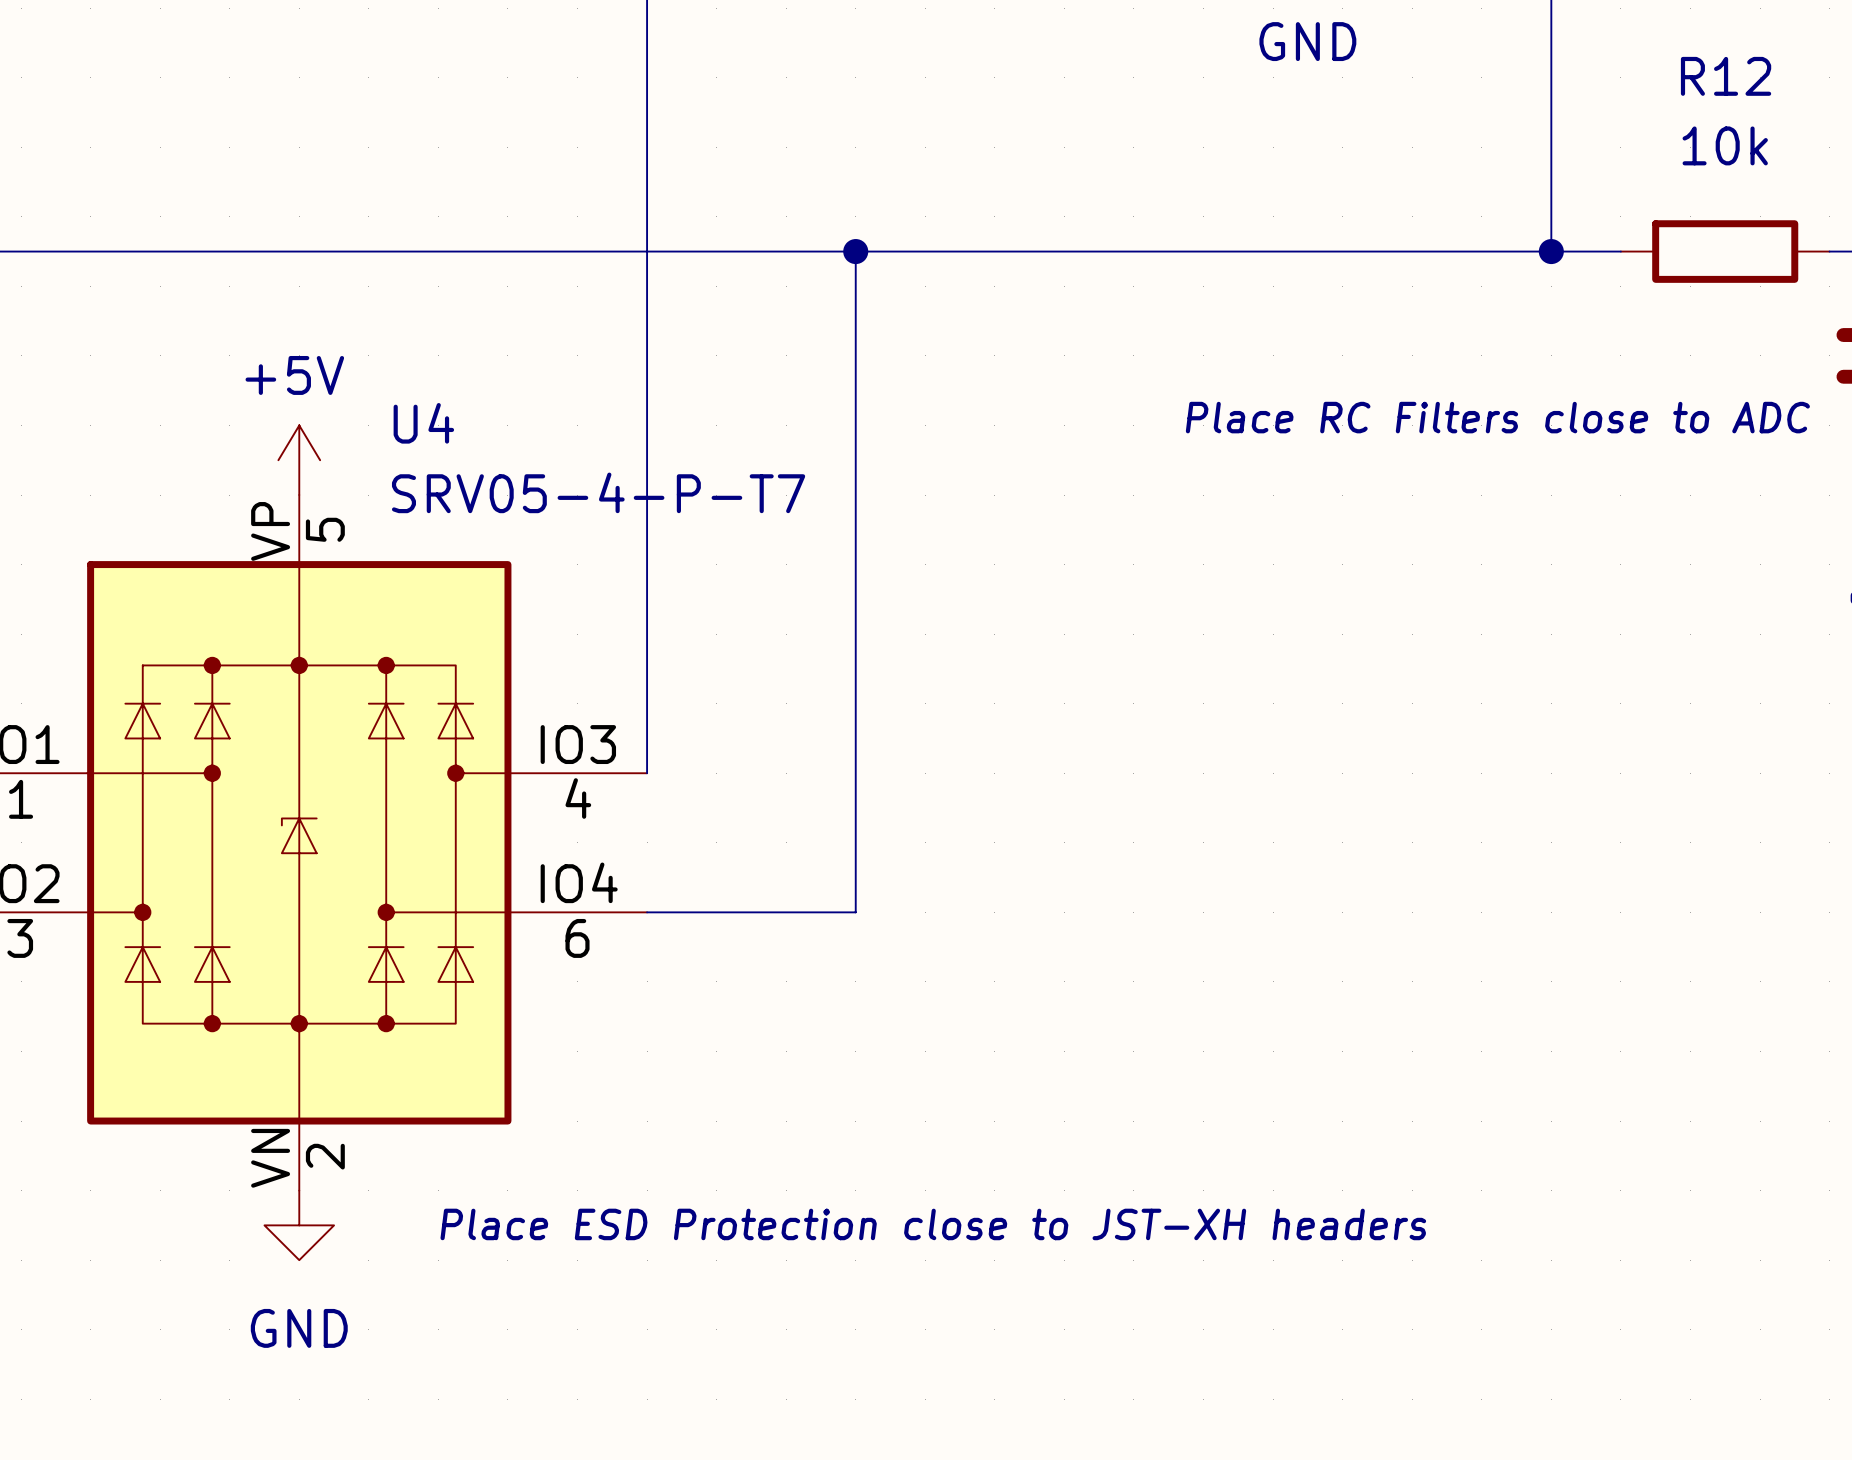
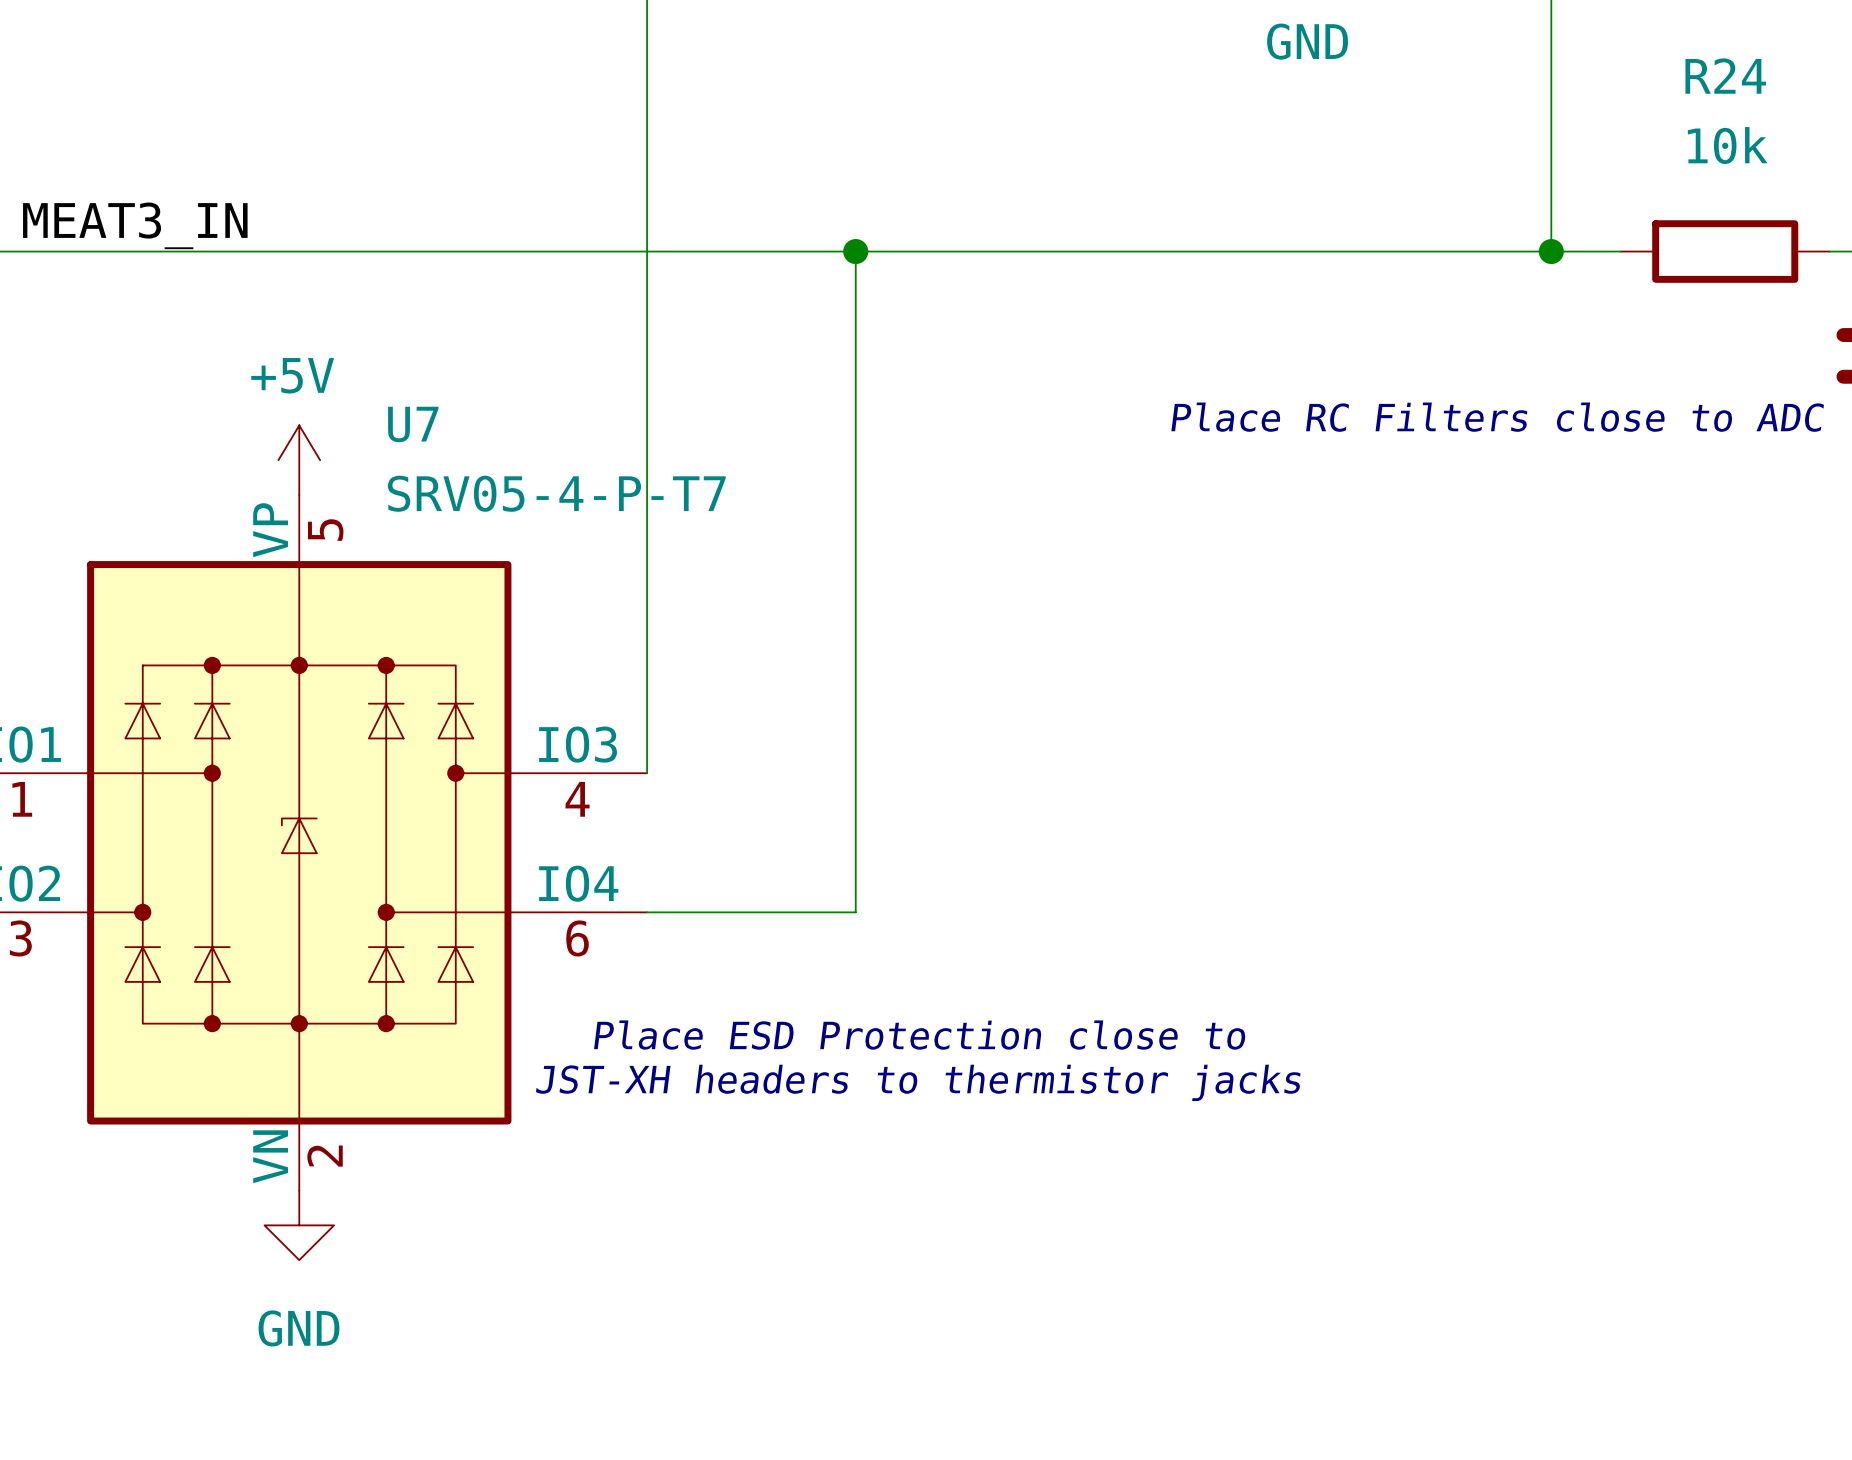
R12 name: R12 (1726, 76) -> R24 (1725, 76)
label: none -> MEAT3_IN (135, 225)
U4 name: U4 (423, 423) -> U7 (413, 424)
text: none -> Place ESD Protection close to (919, 1035)
text: none -> JST-XH headers to thermistor jacks (918, 1082)
text: Place ESD Protection close to JST-XH headers (933, 1224) -> none

